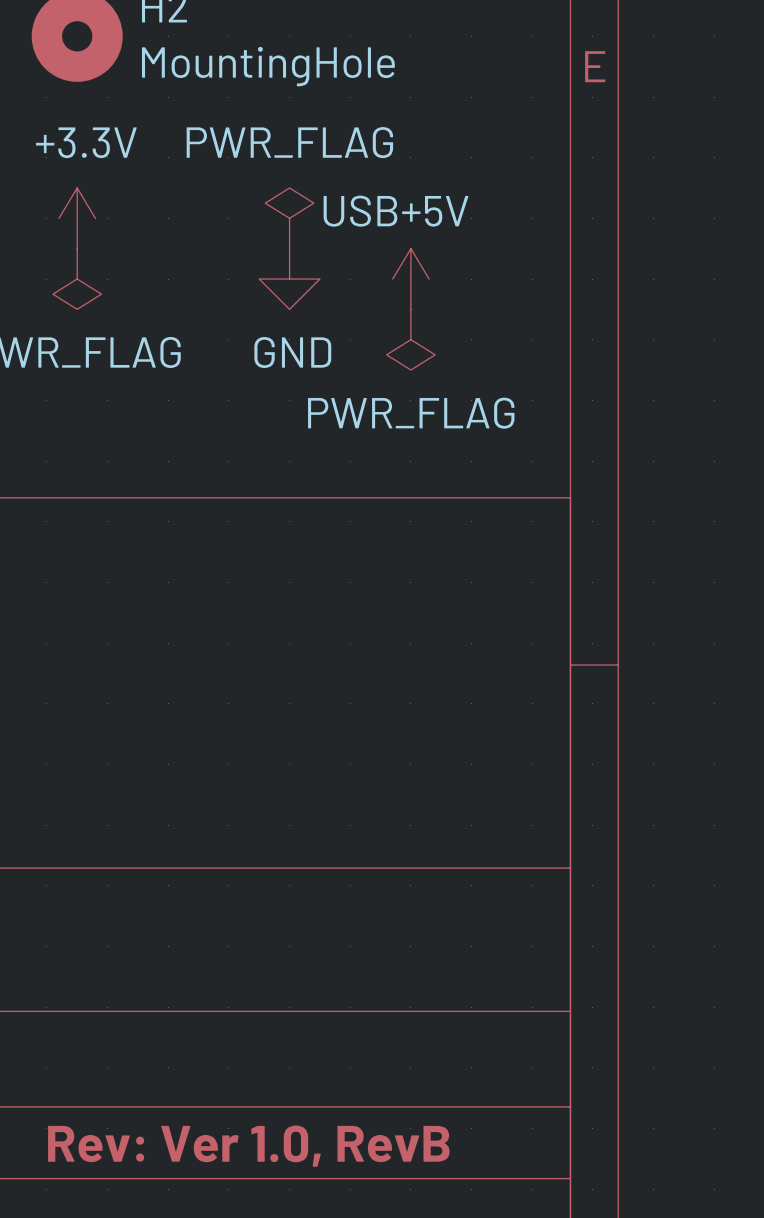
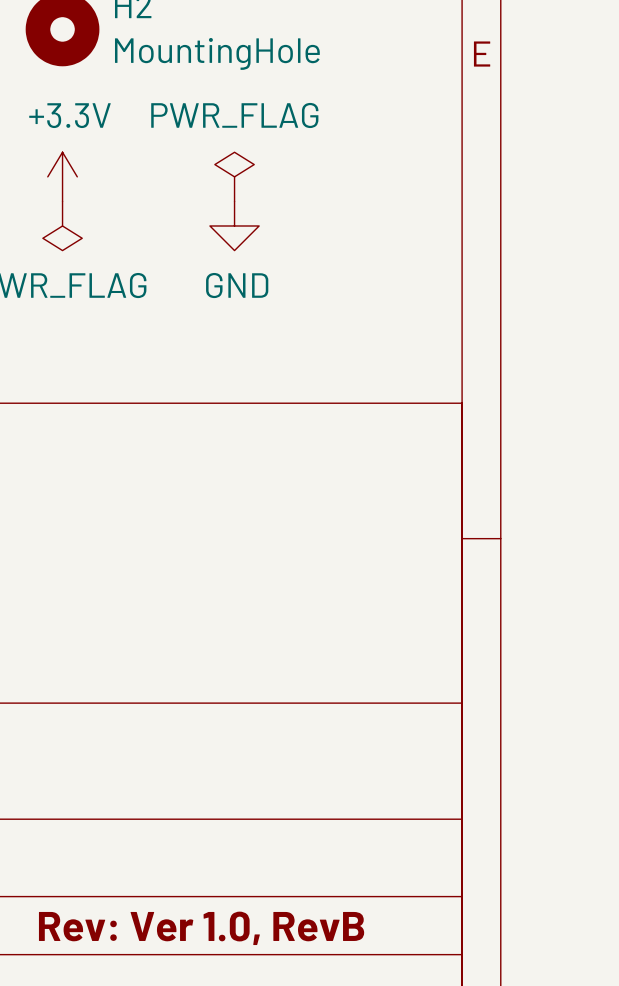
power symbol: USB+5V (410, 279) -> none
power symbol: PWR_FLAG (410, 339) -> none

